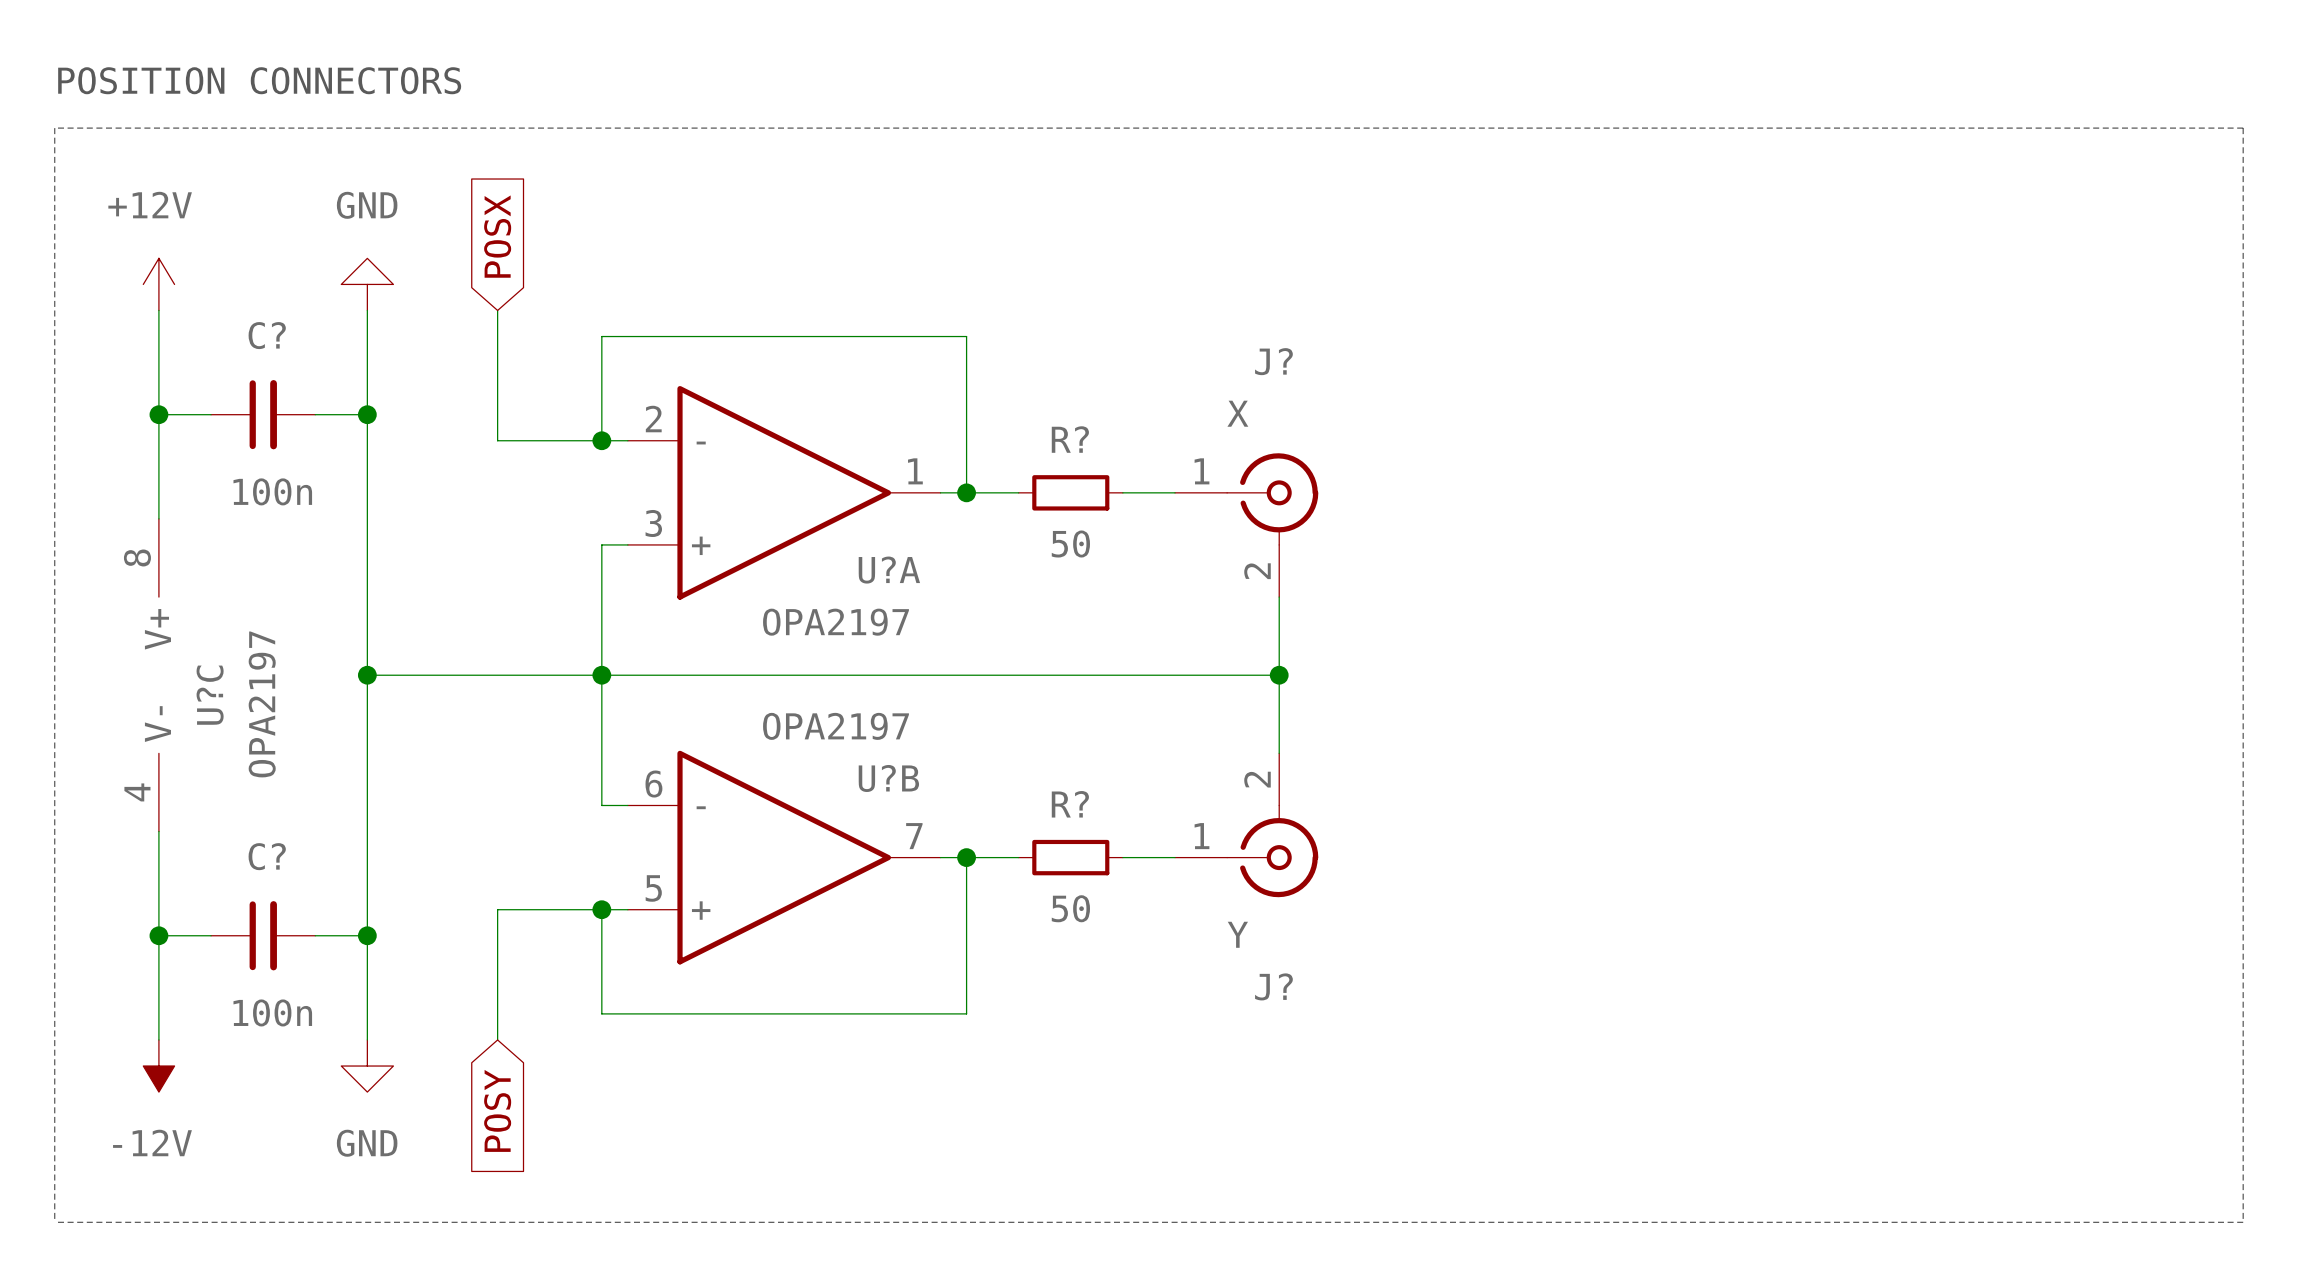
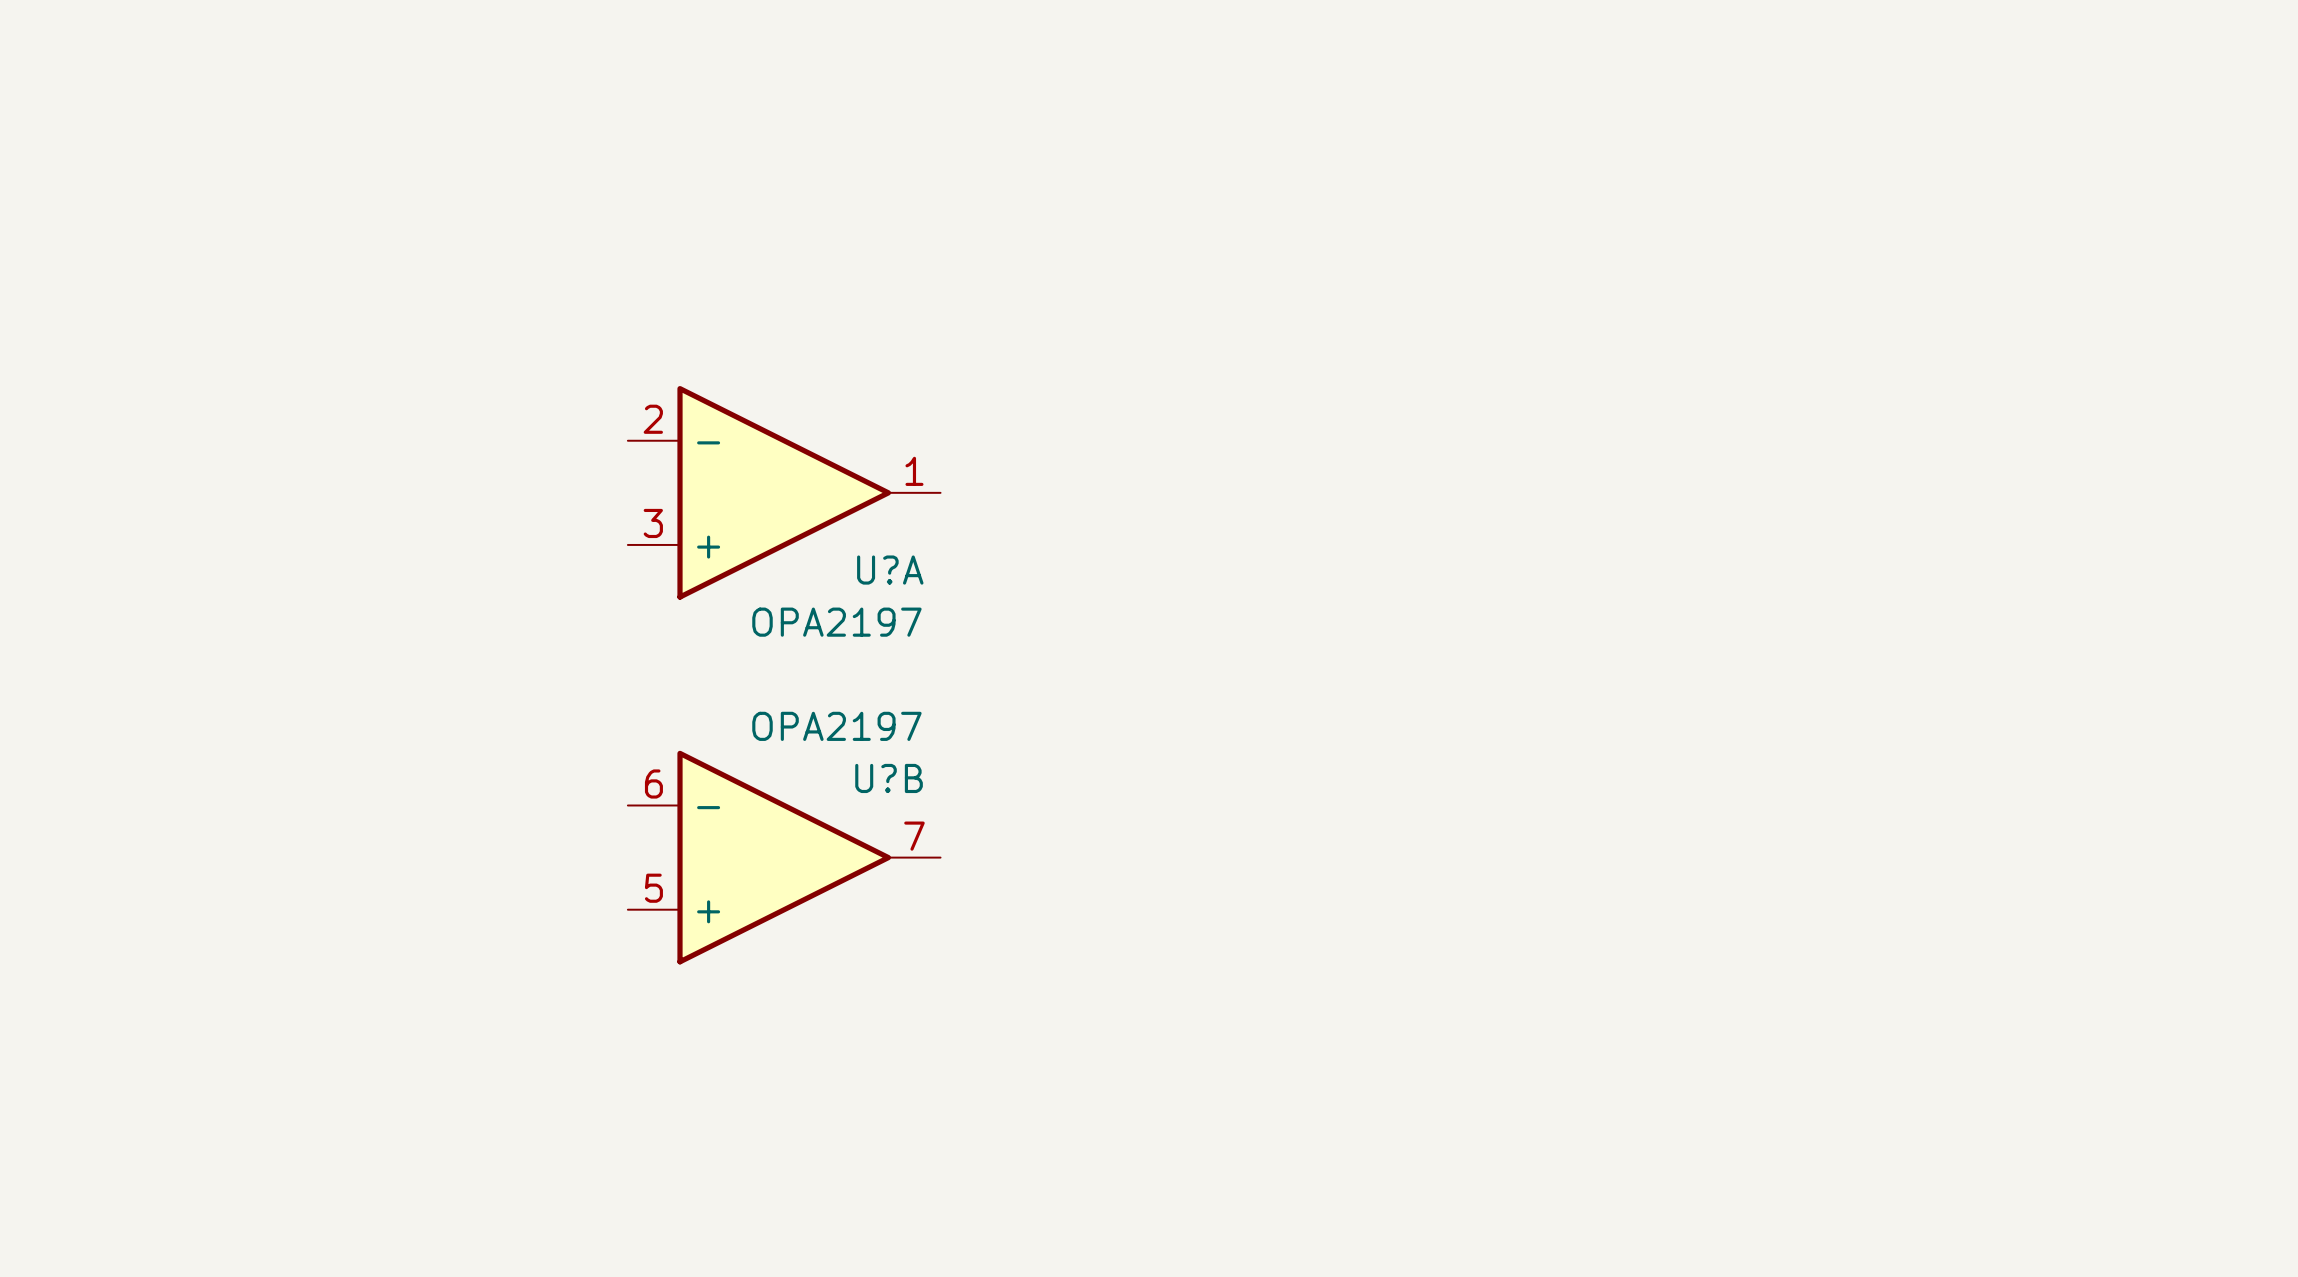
text: POSITION CONNECTORS (259, 80) -> none
line: (54, 128) (2243, 128) (2243, 1222) (54, 1222) (54, 128) -> none
global label: POSX (497, 236) -> none
power symbol: +12V (158, 284) -> none
power symbol: GND (367, 284) -> none
wire: (158, 310) (158, 518) -> none
wire: (367, 310) (367, 1039) -> none
wire: (497, 310) (497, 440) (627, 440) -> none
wire: (158, 414) (211, 414) -> none
junction: (158, 414) -> none
C?: 100n (263, 414) -> none
wire: (315, 414) (367, 414) -> none
junction: (367, 414) -> none
wire: (601, 440) (601, 336) (966, 336) (966, 492) -> none
junction: (601, 440) -> none
wire: (940, 492) (1018, 492) -> none
junction: (966, 492) -> none
R?: 50 (1070, 492) -> none
wire: (1122, 492) (1175, 492) -> none
J?: X (1246, 525) -> none
wire: (627, 544) (601, 544) (601, 805) (627, 805) -> none
wire: (1279, 597) (1279, 753) -> none
U?C: OPA2197 (158, 675) -> none
wire: (367, 675) (1279, 675) -> none
junction: (367, 675) -> none
junction: (601, 675) -> none
junction: (1279, 675) -> none
J?: Y (1246, 825) -> none
wire: (158, 831) (158, 1039) -> none
wire: (940, 857) (1018, 857) -> none
wire: (966, 857) (966, 1013) (601, 1013) (601, 909) -> none
junction: (966, 857) -> none
R?: 50 (1070, 857) -> none
wire: (1122, 857) (1175, 857) -> none
junction: (601, 909) -> none
wire: (627, 909) (497, 909) (497, 1039) -> none
wire: (158, 935) (211, 935) -> none
junction: (158, 935) -> none
C?: 100n (263, 935) -> none
wire: (315, 935) (367, 935) -> none
junction: (367, 935) -> none
power symbol: -12V (158, 1066) -> none
power symbol: GND (367, 1066) -> none
global label: POSY (497, 1110) -> none

